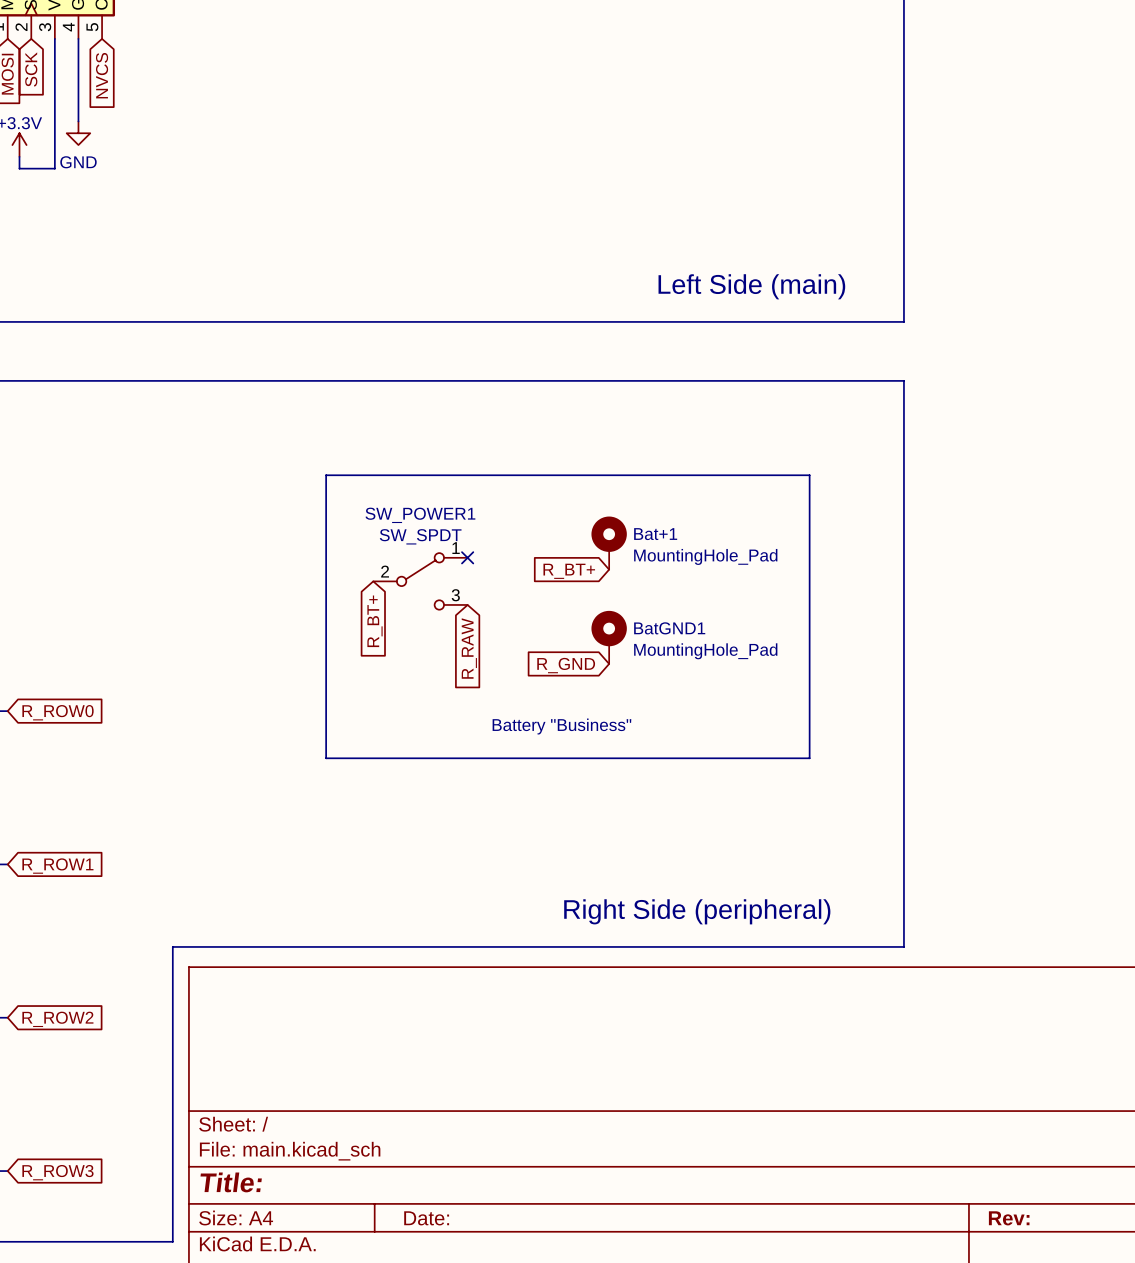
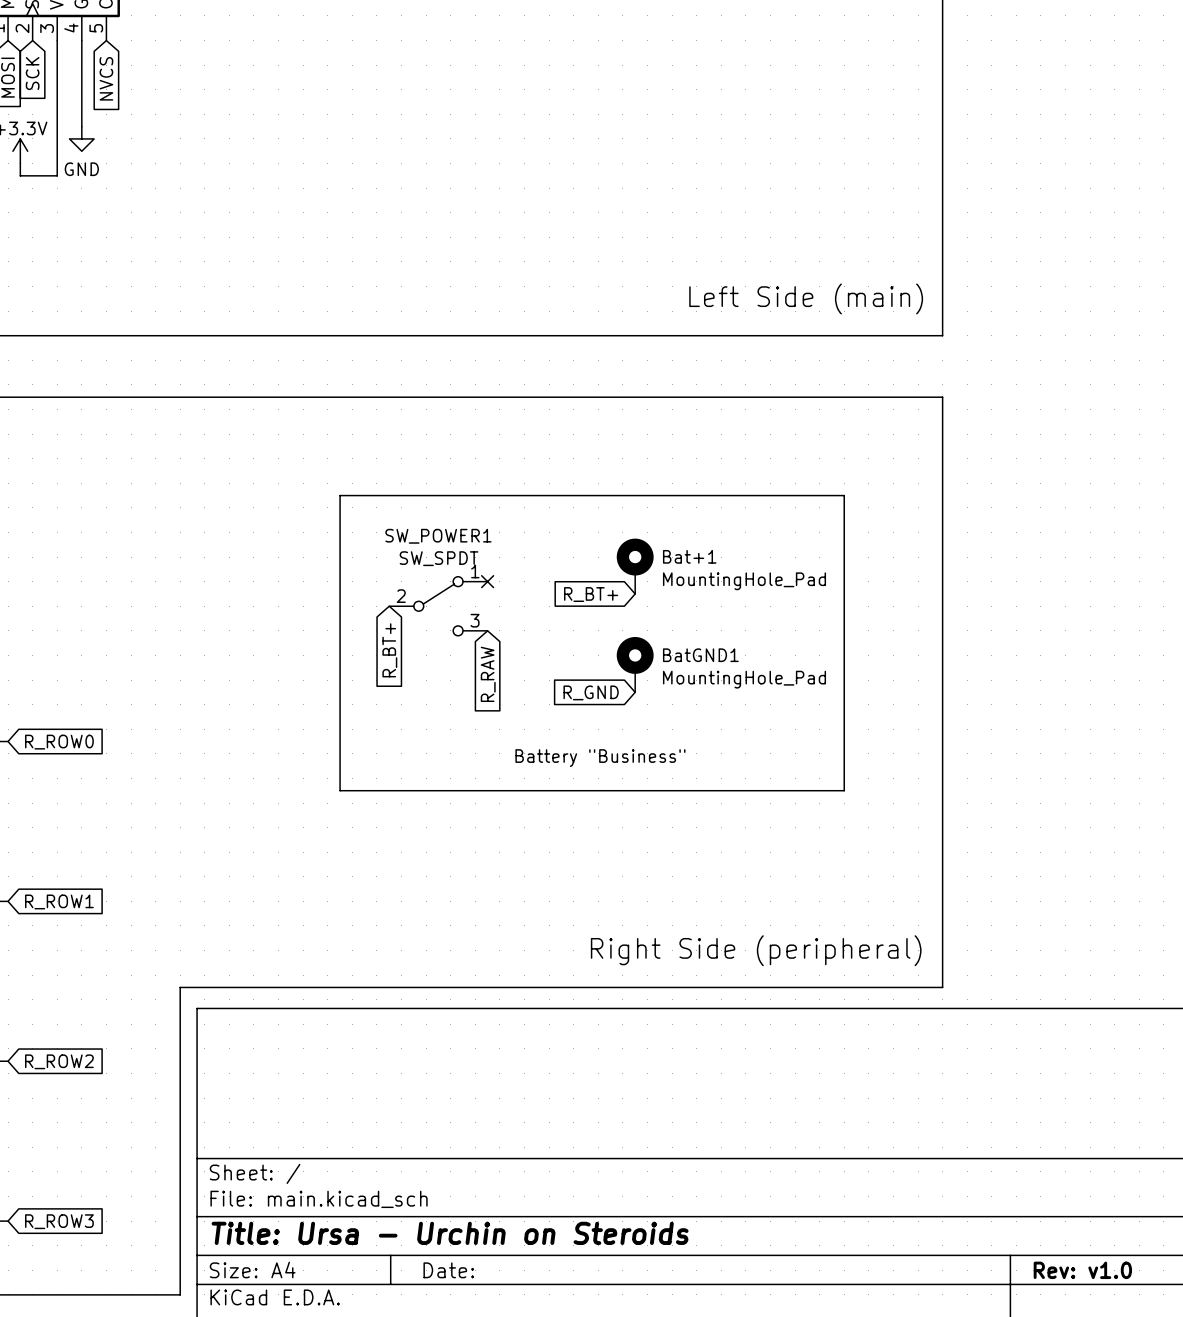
title block: Title: (231, 1182) -> Title: Ursa - Urchin on Steroids (450, 1233)
title block: Rev: (1009, 1218) -> Rev: v1.0 (1082, 1270)

